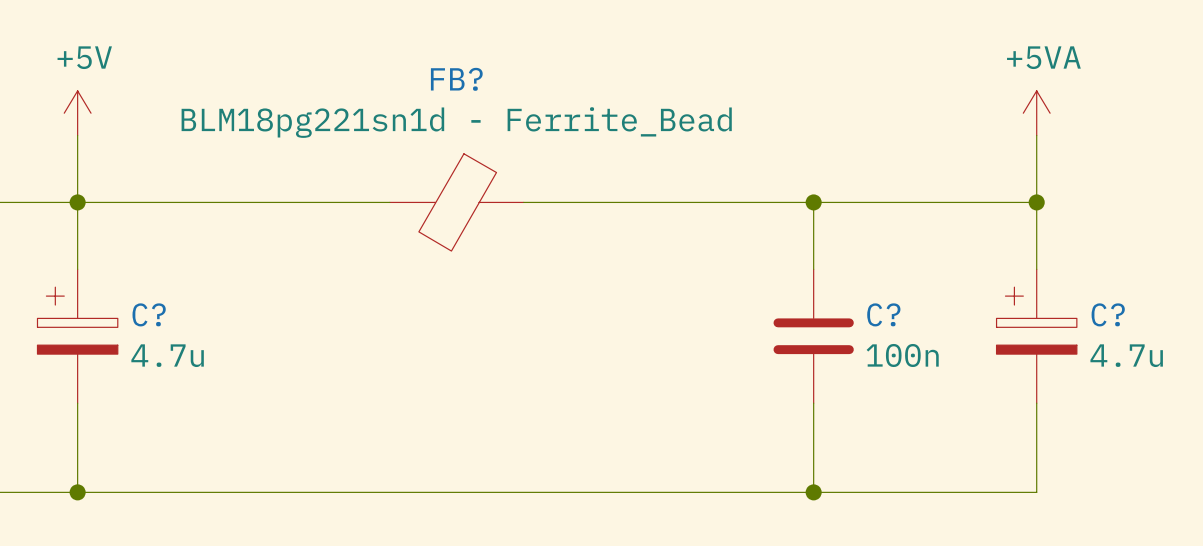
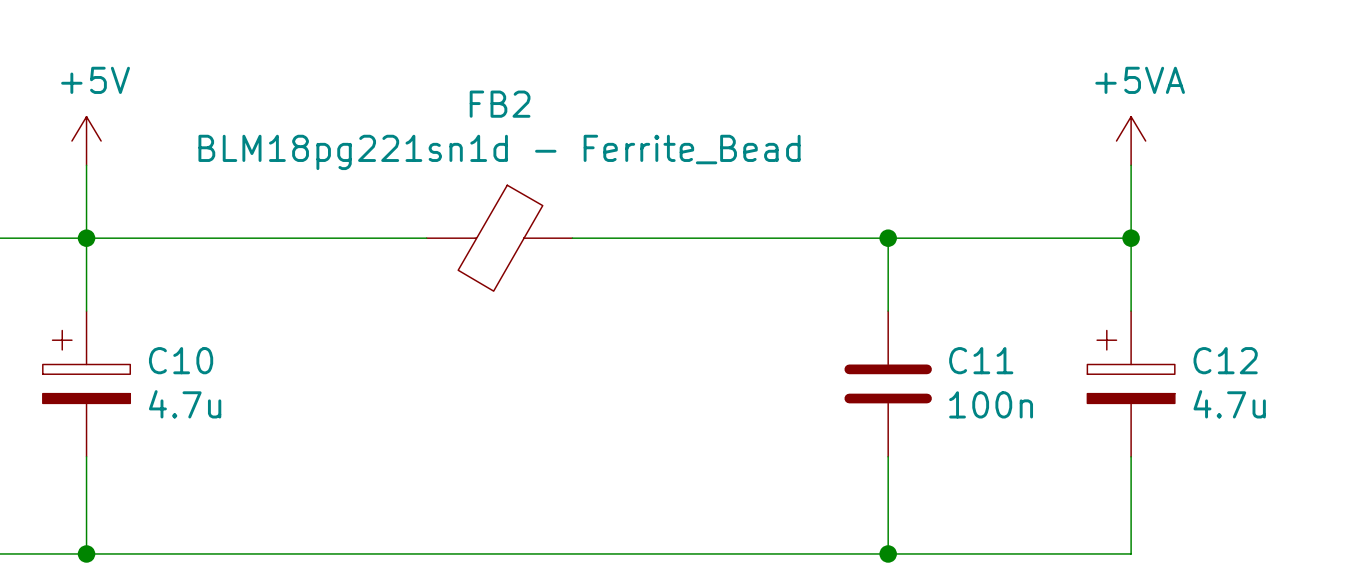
FB? name: FB? (456, 79) -> FB2 (500, 104)
C? name: C? (149, 314) -> C10 (181, 360)
C? name: C? (883, 314) -> C11 (981, 360)
C? name: C? (1108, 314) -> C12 (1225, 360)

